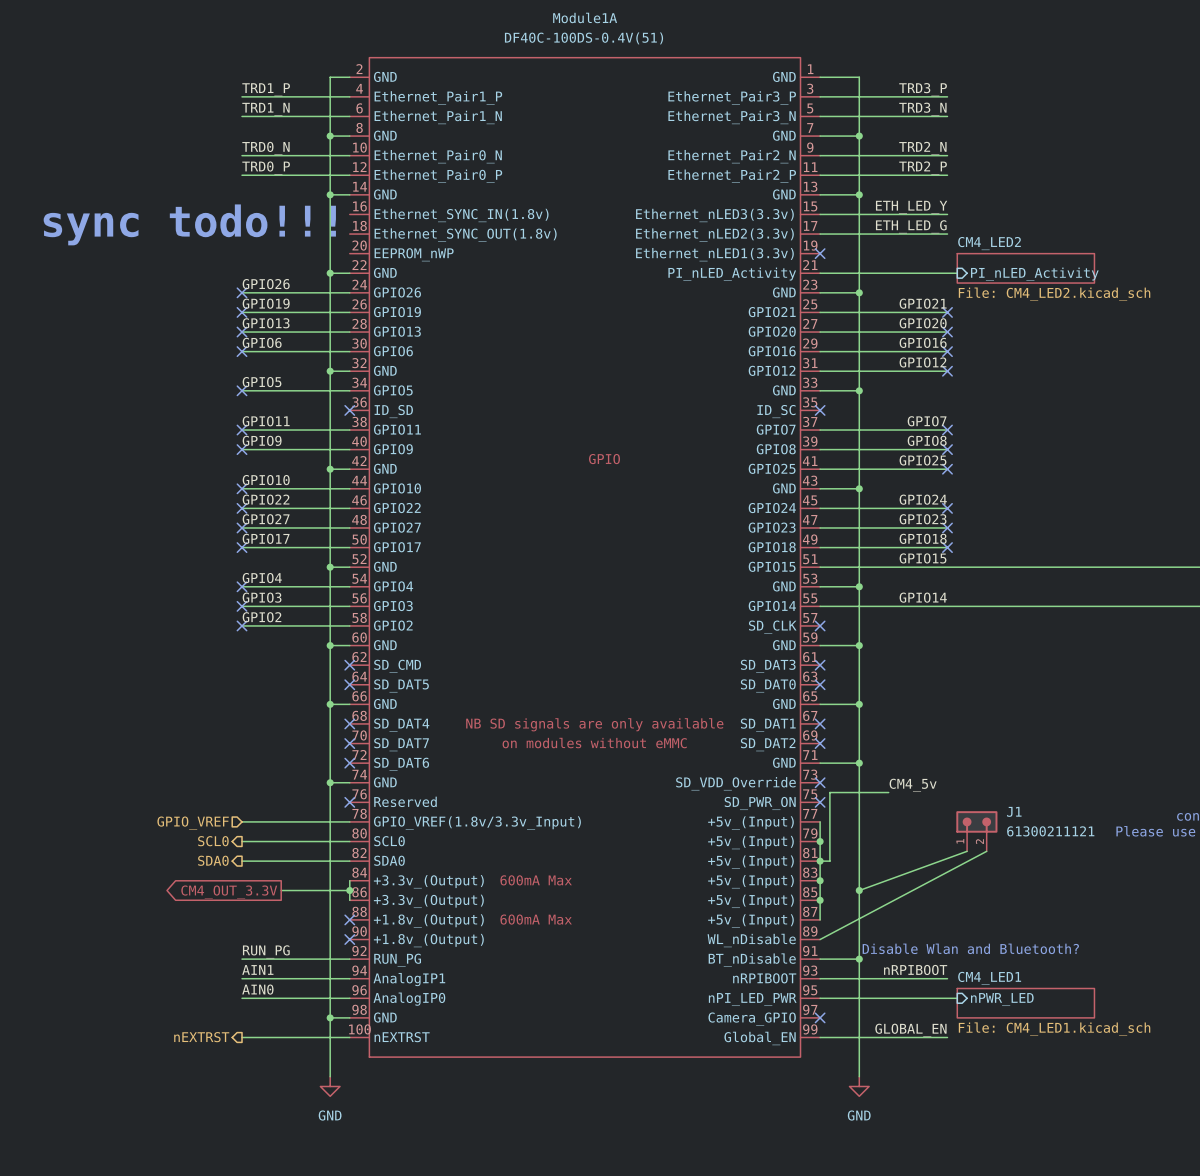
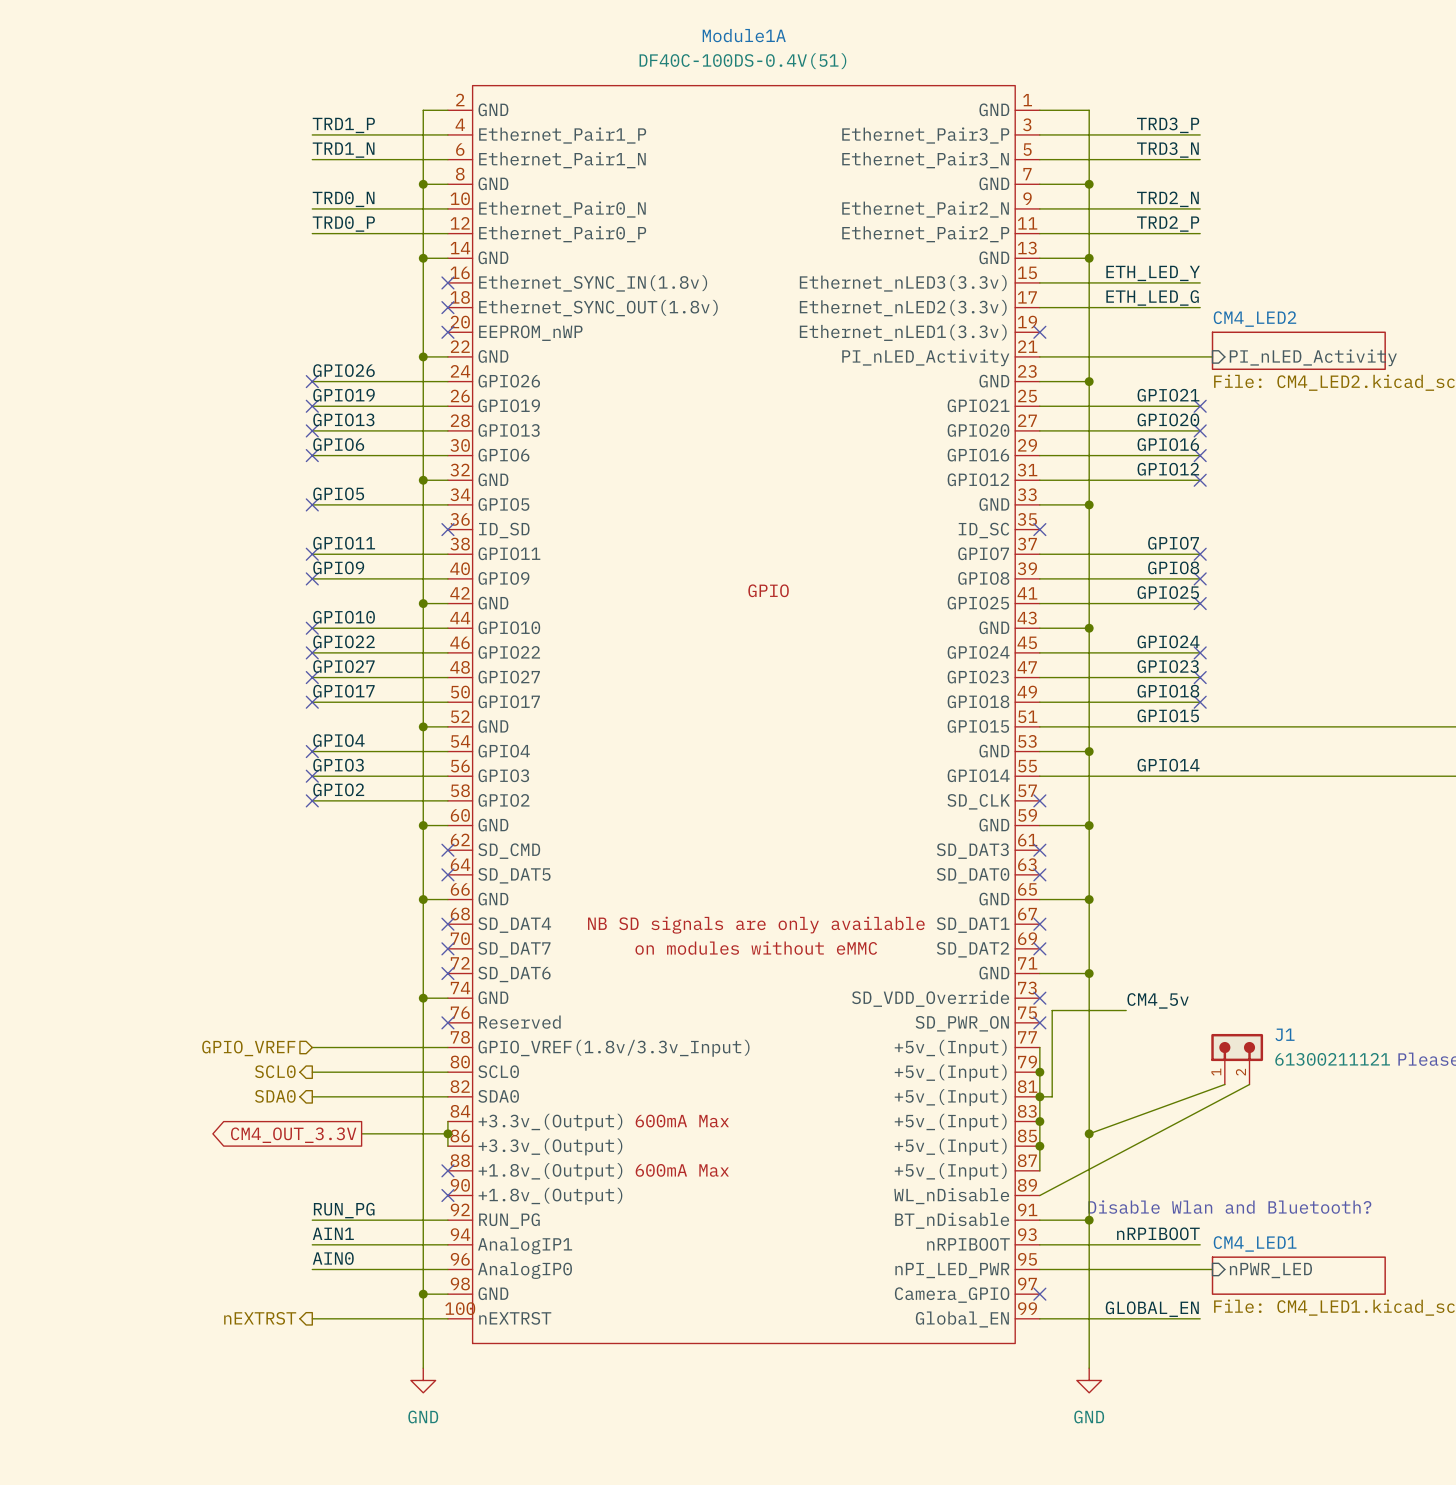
no-connect mark: none -> (447, 282)
text: sync todo!!! (189, 224) -> none
no-connect mark: none -> (447, 307)
no-connect mark: none -> (447, 332)

